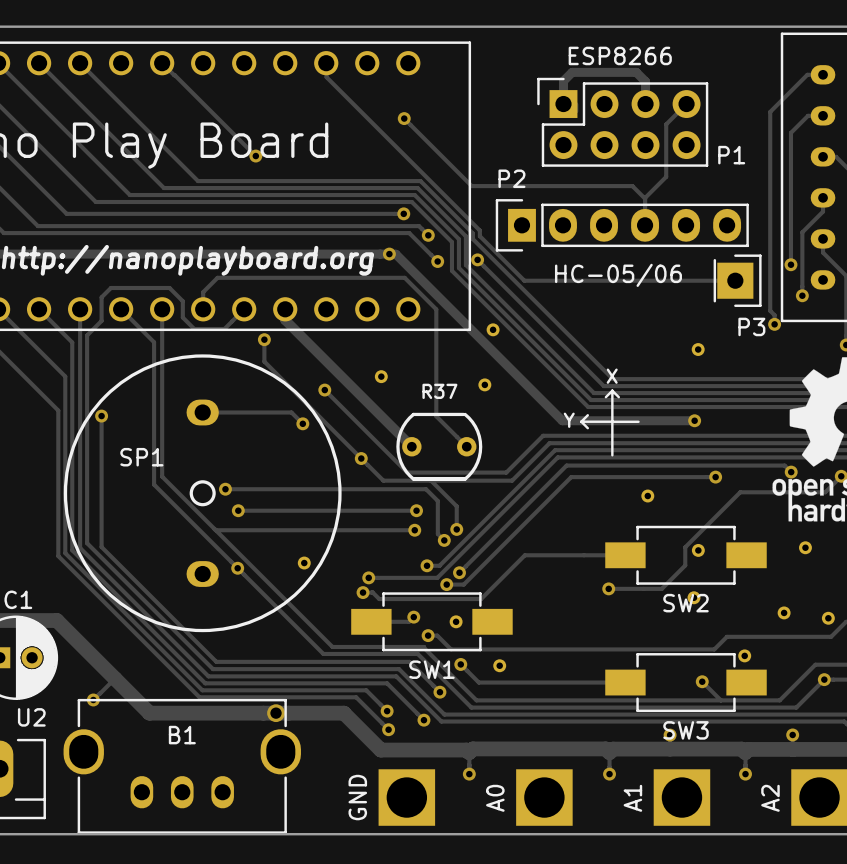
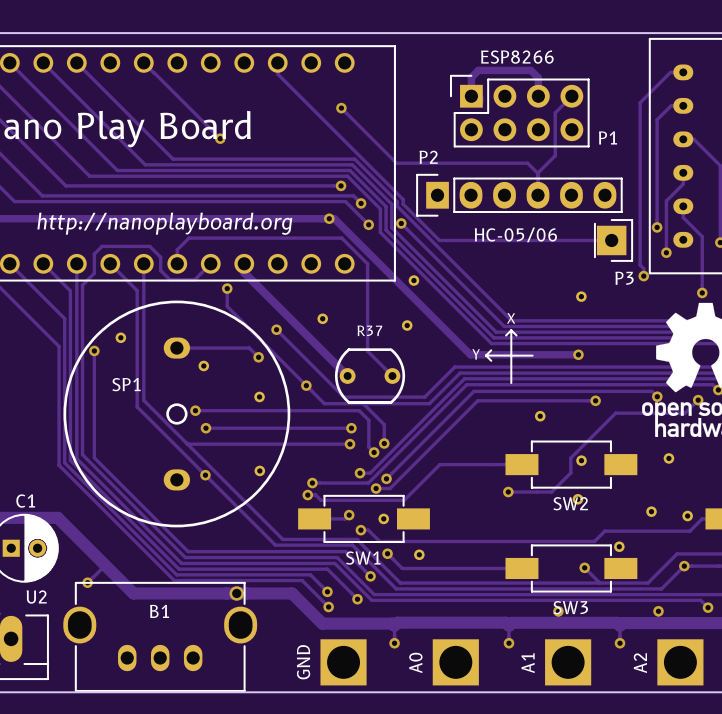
part: none -> (120, 337)
part: none -> (203, 365)
part: none -> (259, 396)

